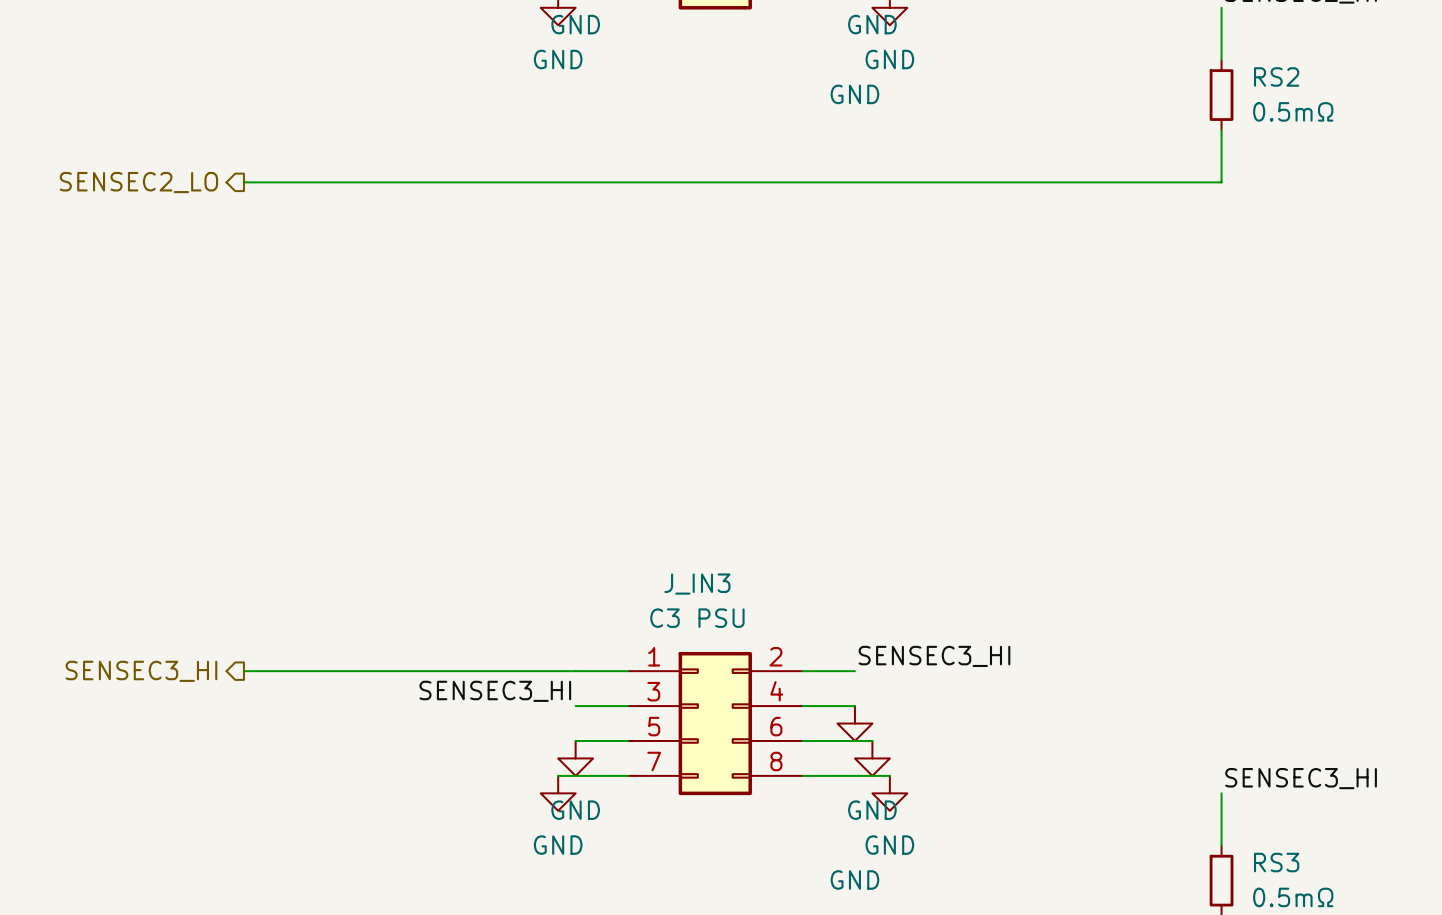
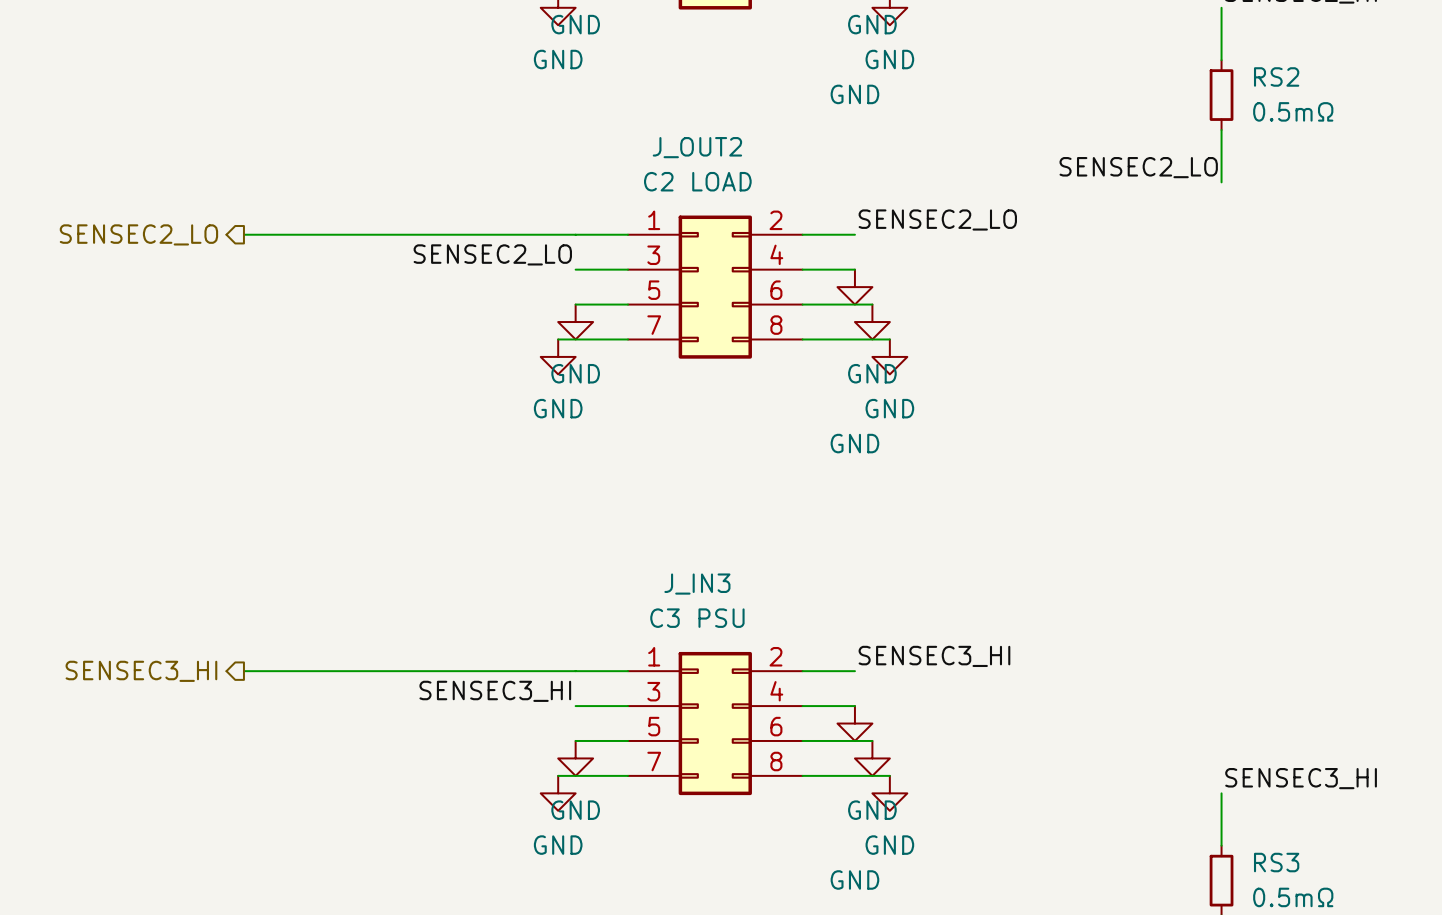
label: none -> SENSEC2_LO (1138, 167)
hierarchical label position: SENSEC2_LO (138, 182) -> SENSEC2_LO (138, 234)
wire: (243, 182) (1221, 182) -> none
label: none -> SENSEC2_LO (937, 219)
wire: none -> (243, 234) (628, 234)
wire: none -> (802, 234) (854, 234)
label: none -> SENSEC2_LO (492, 254)
wire: none -> (575, 269) (628, 269)
wire: none -> (802, 269) (854, 269)
J_OUT2: none -> C2 LOAD (715, 287)
power symbol: none -> GND (854, 287)
wire: none -> (575, 304) (628, 304)
wire: none -> (802, 304) (872, 304)
power symbol: none -> GND (575, 322)
power symbol: none -> GND (872, 322)
wire: none -> (558, 339) (628, 339)
wire: none -> (802, 339) (889, 339)
power symbol: none -> GND (558, 356)
power symbol: none -> GND (889, 356)

